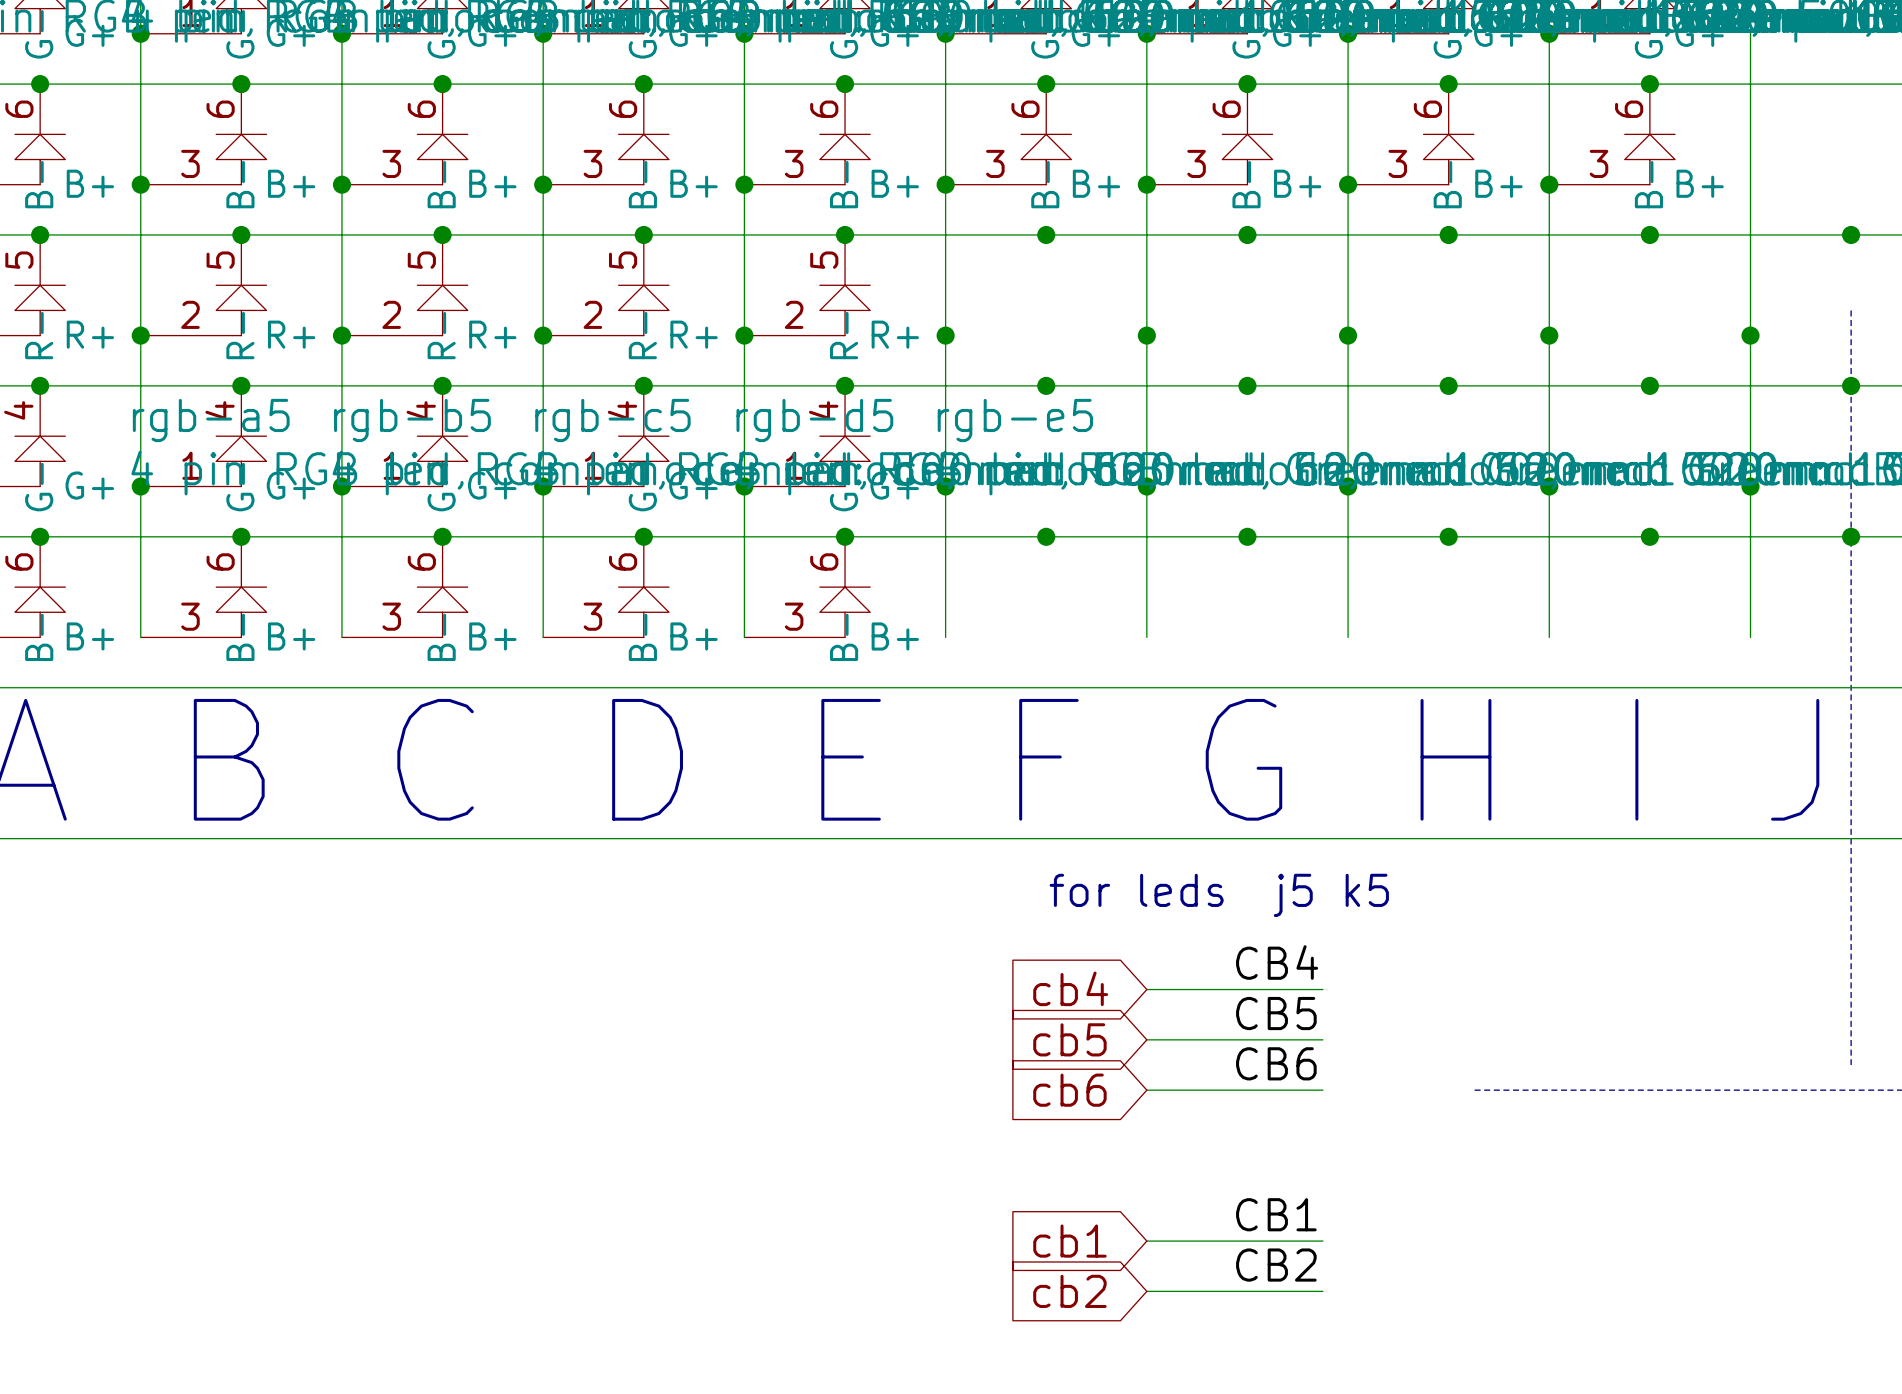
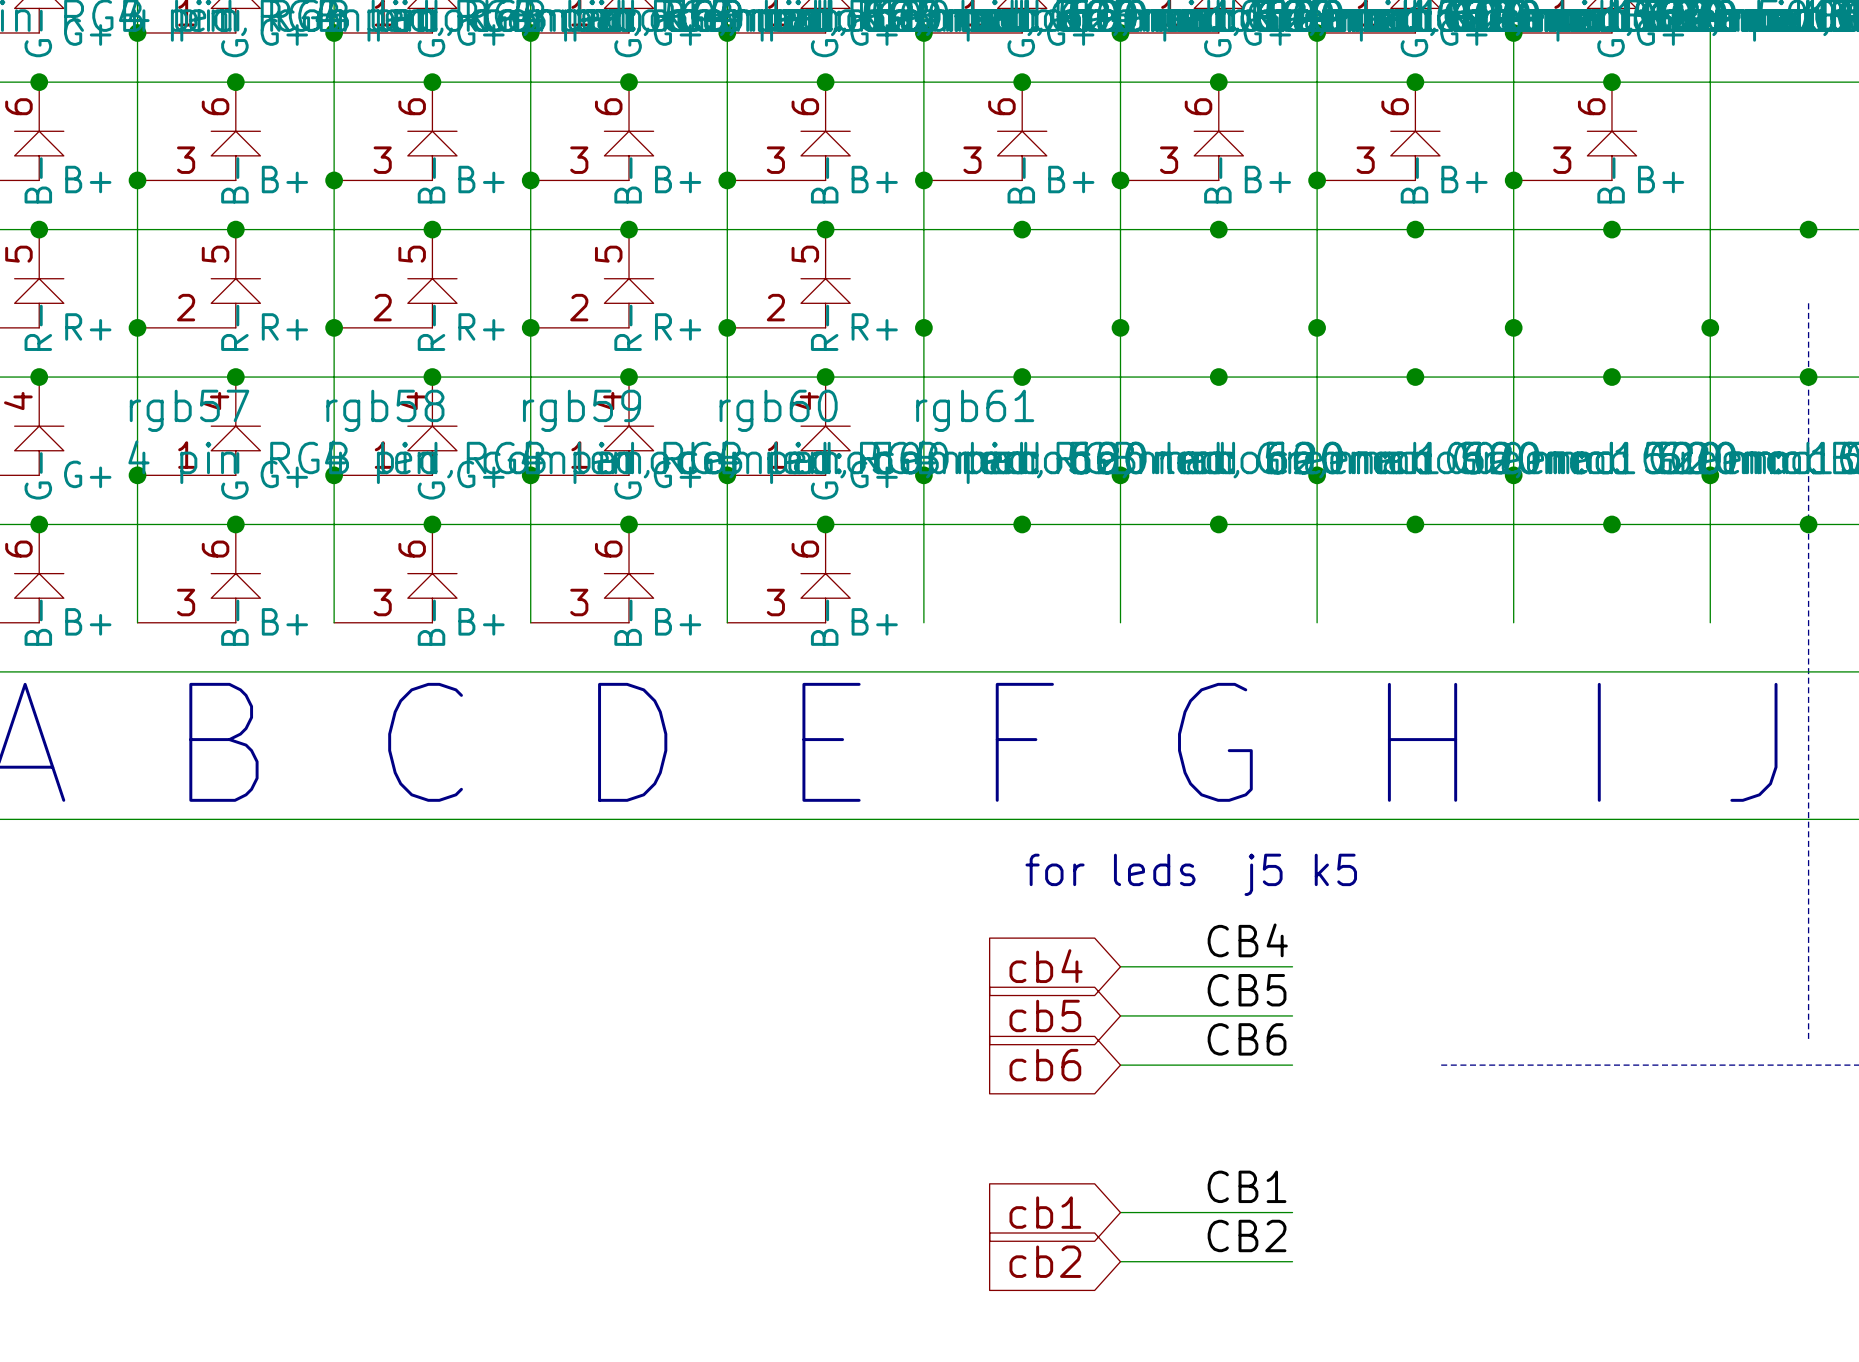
rgb-a5 name: rgb-a5 (211, 420) -> rgb57 (189, 410)
rgb-b5 name: rgb-b5 (412, 420) -> rgb58 (385, 410)
rgb-c5 name: rgb-c5 (612, 420) -> rgb59 (582, 410)
rgb-d5 name: rgb-d5 (814, 420) -> rgb60 (778, 410)
rgb-e5 name: rgb-e5 (1015, 420) -> rgb61 (975, 410)

